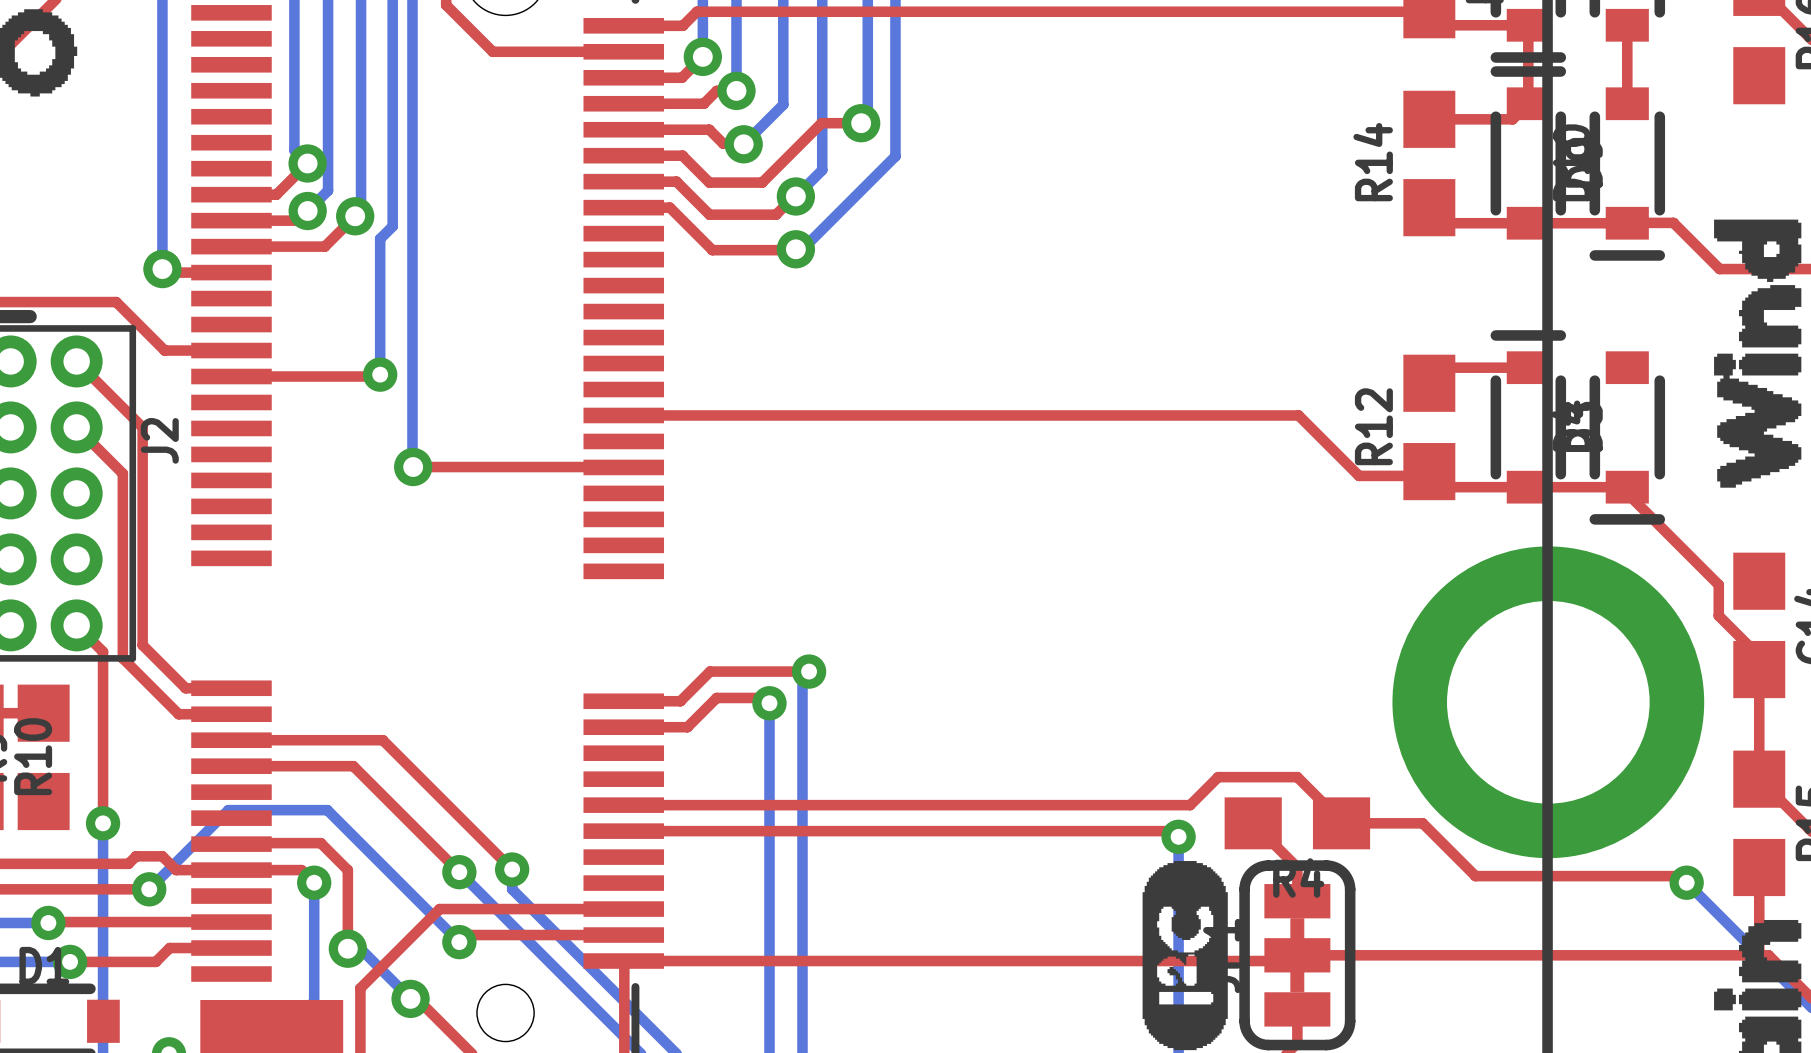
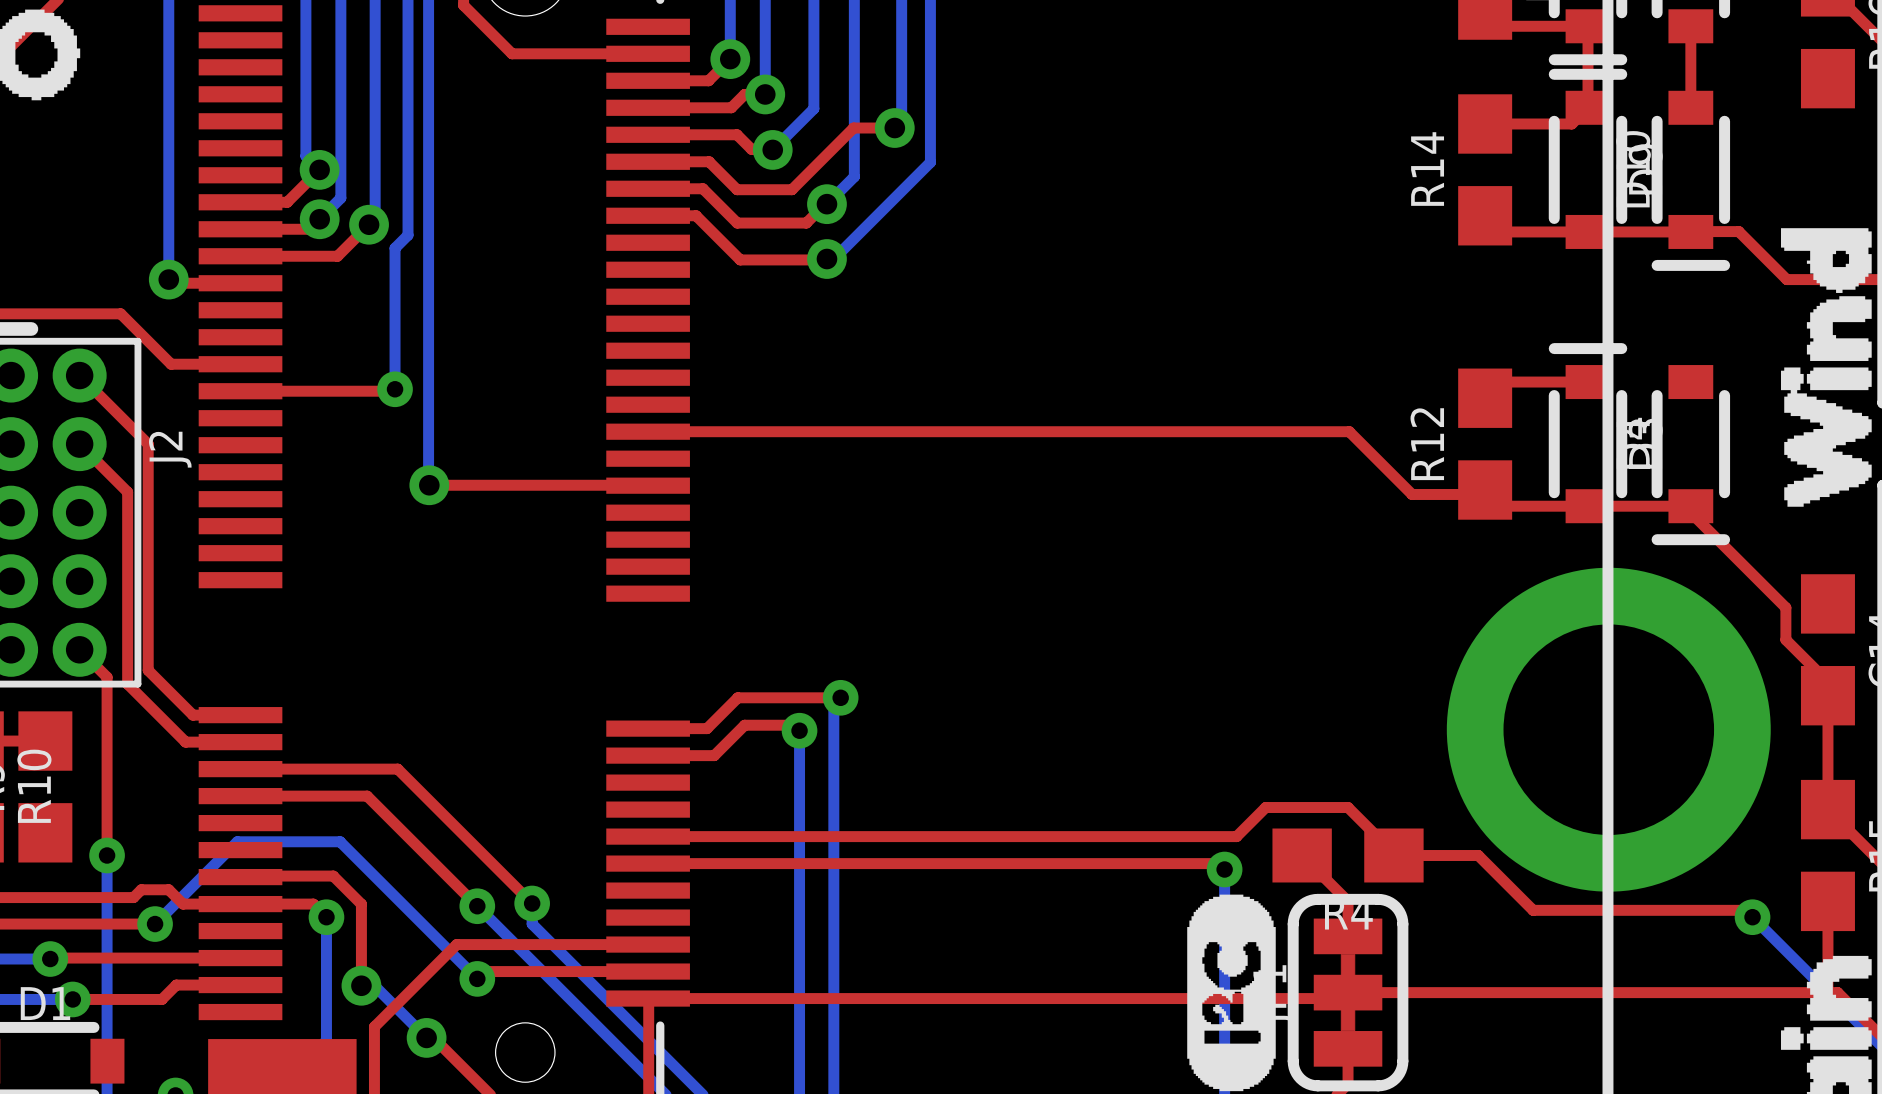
top track: (1431, 11) (696, 11) (682, 25) (623, 25) -> none

